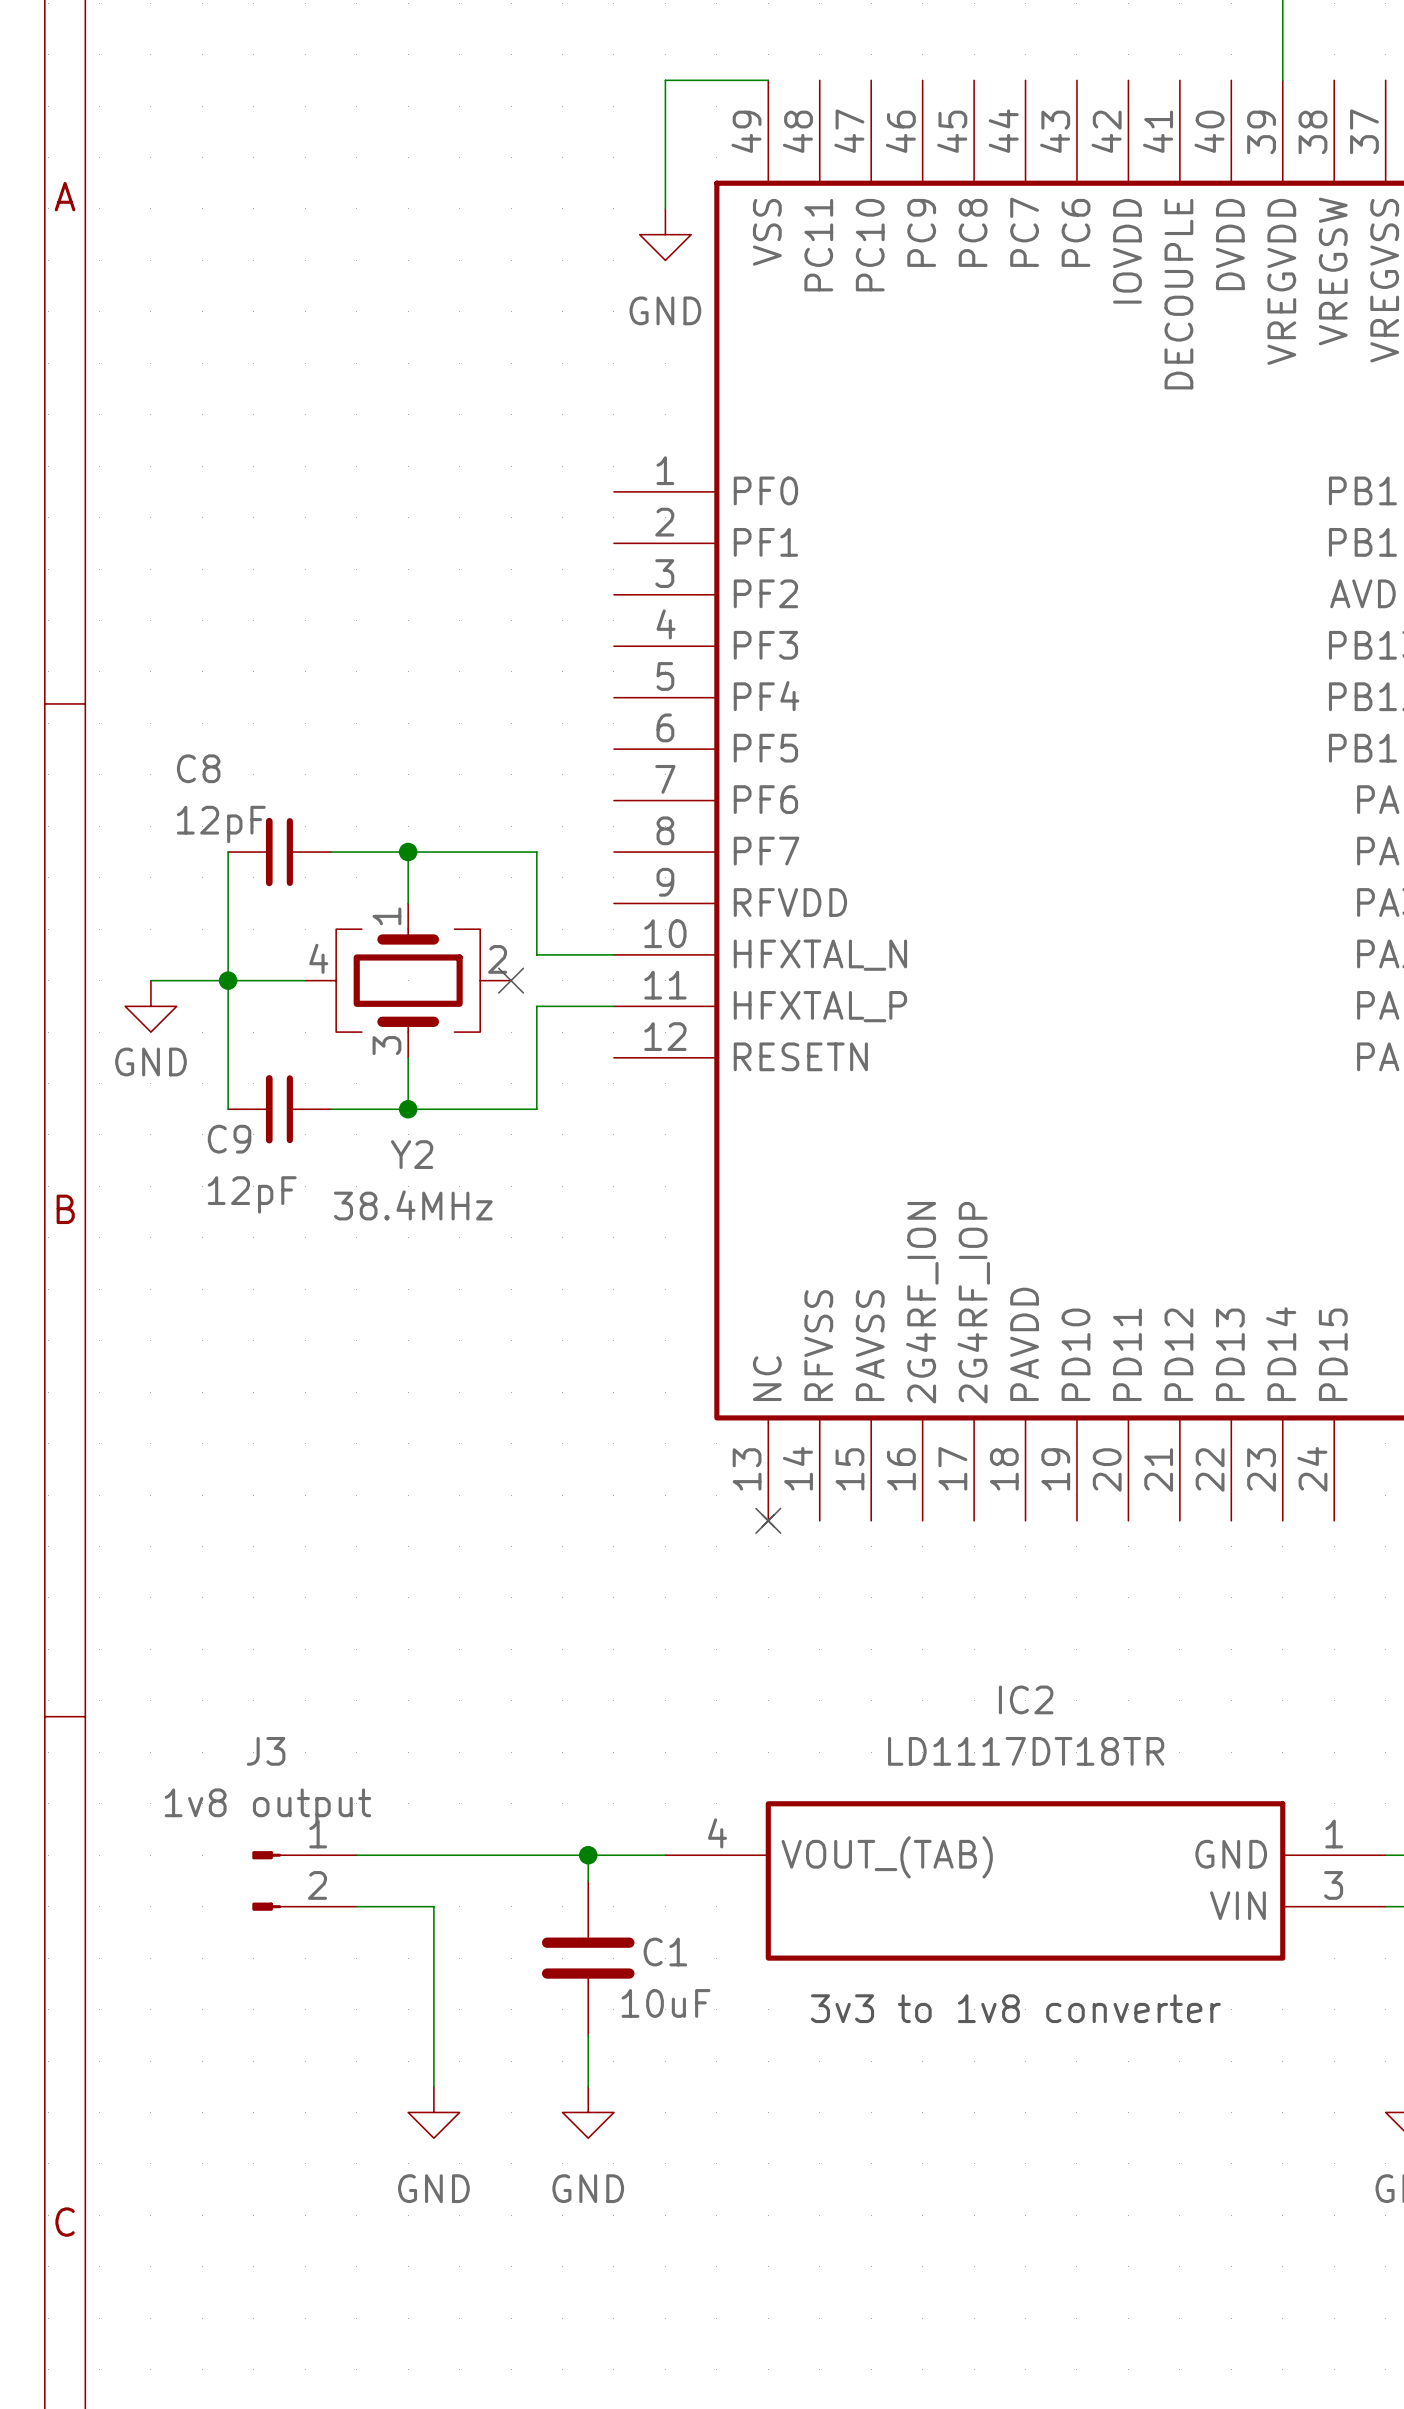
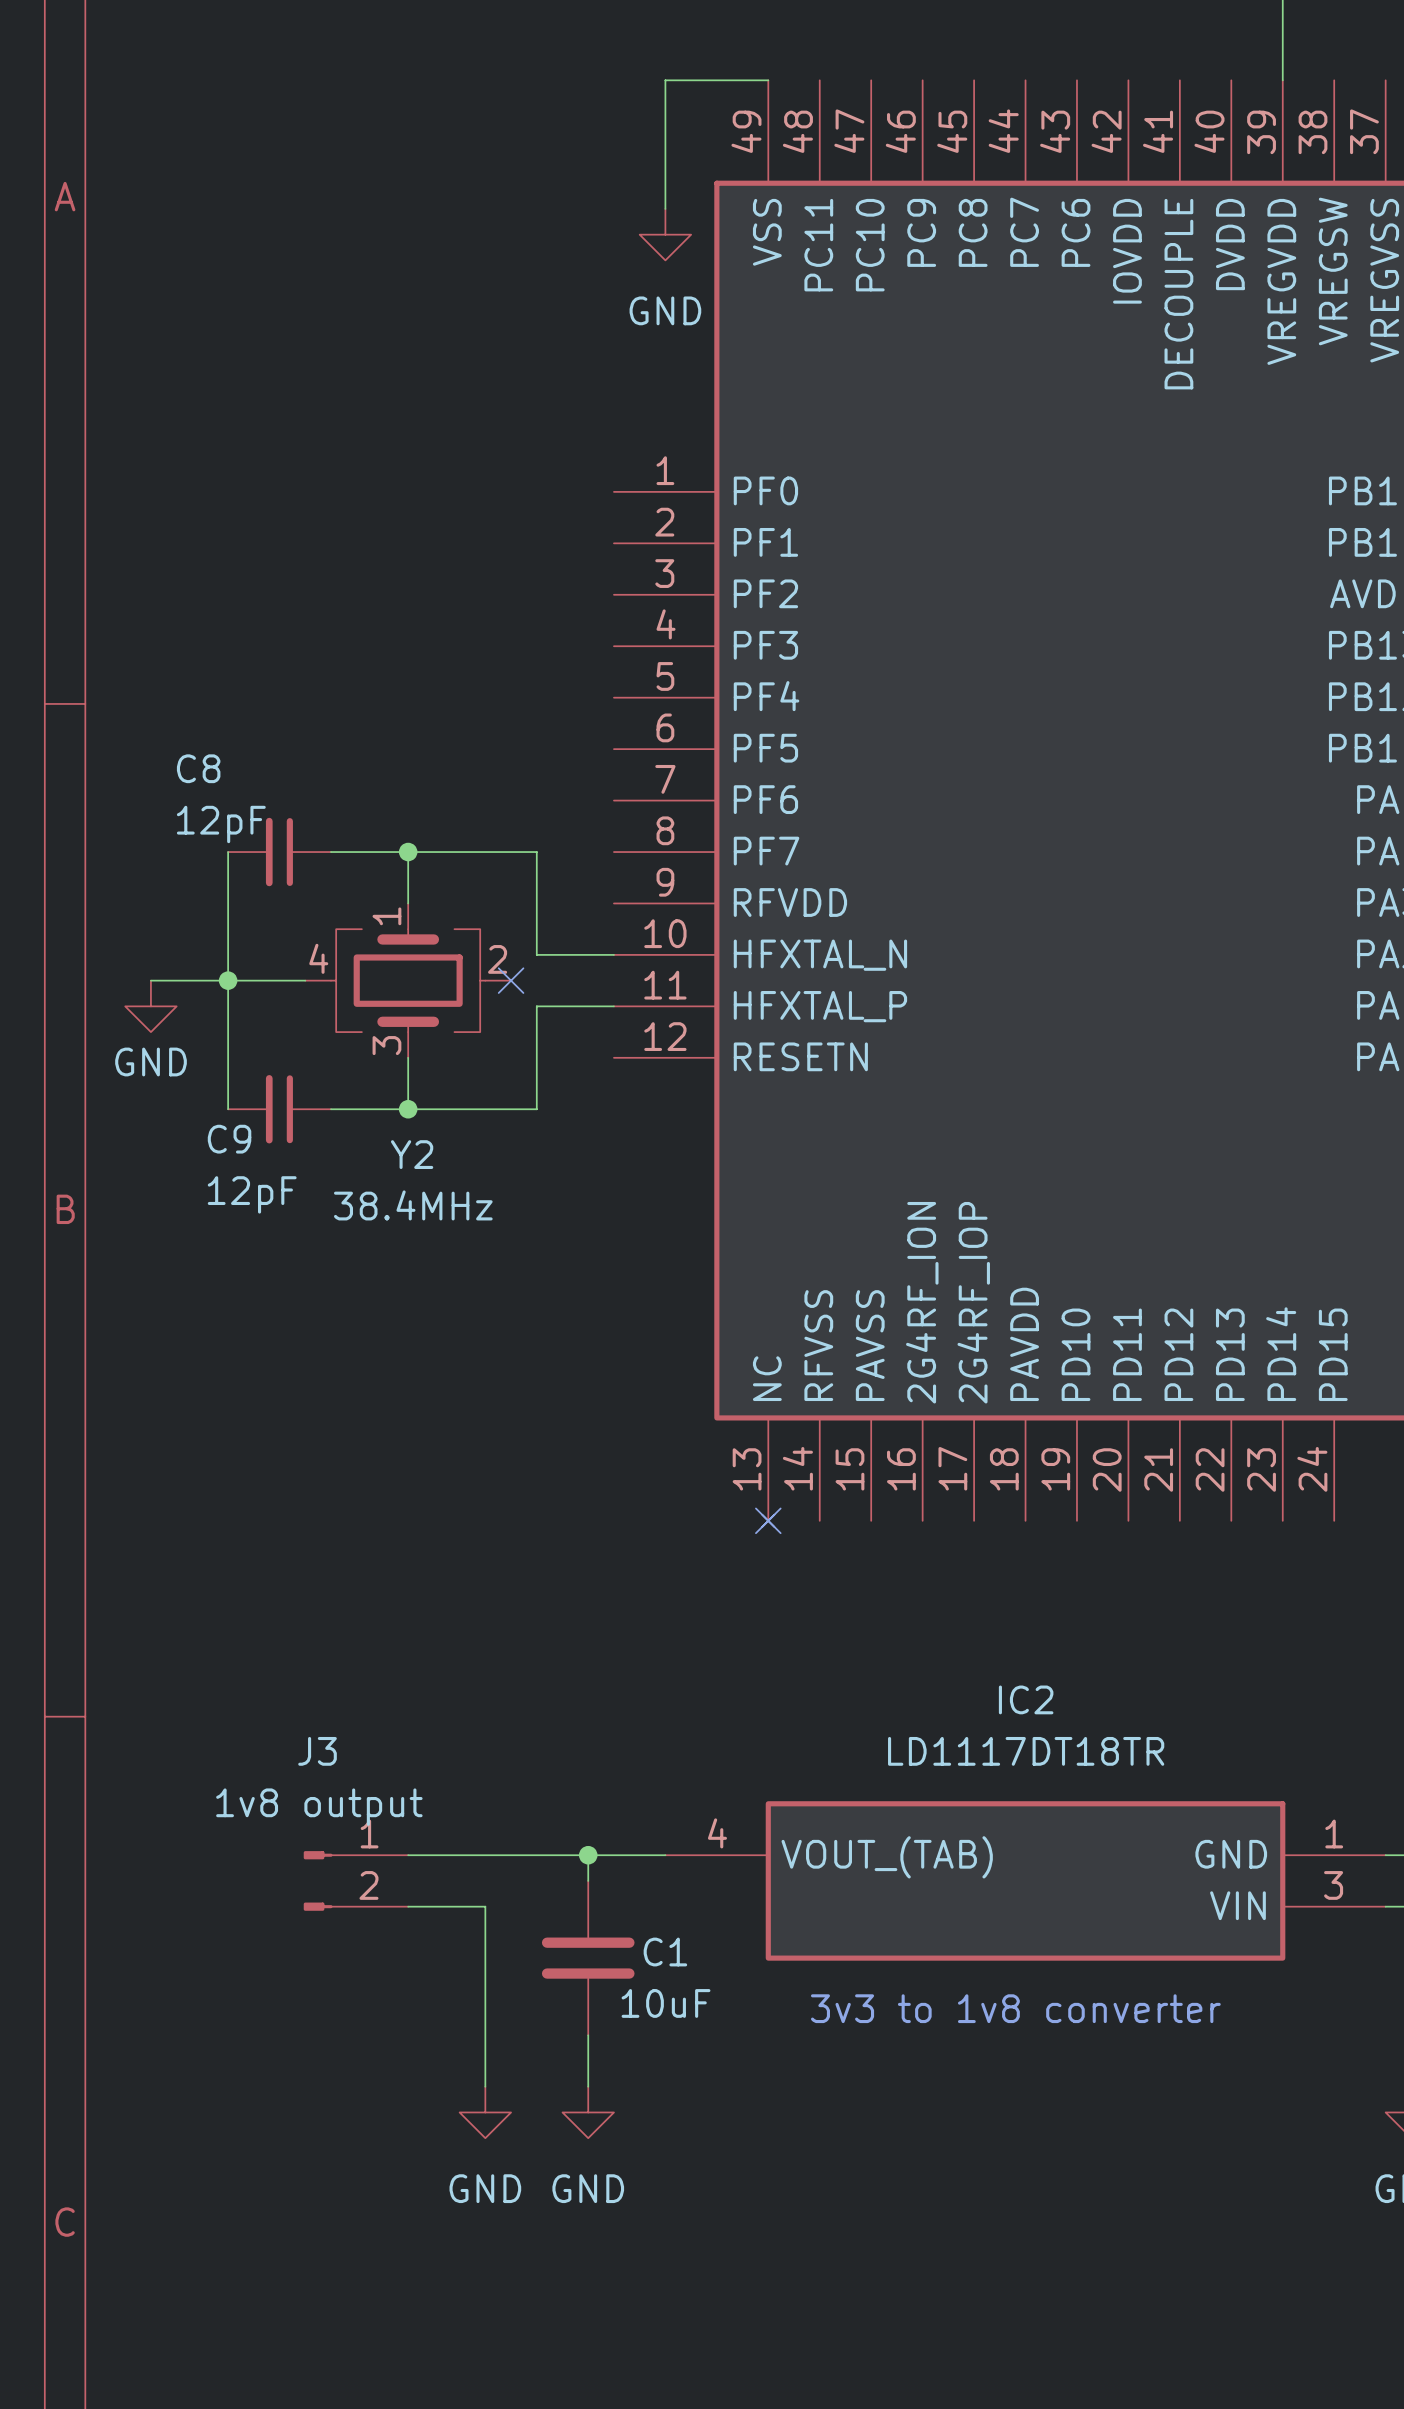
J3 position: (304, 1880) -> (355, 1880)
wire: (433, 1906) (433, 2086) -> (433, 1906) (485, 1906) (485, 2086)
power symbol position: GND (433, 2112) -> GND (485, 2112)

